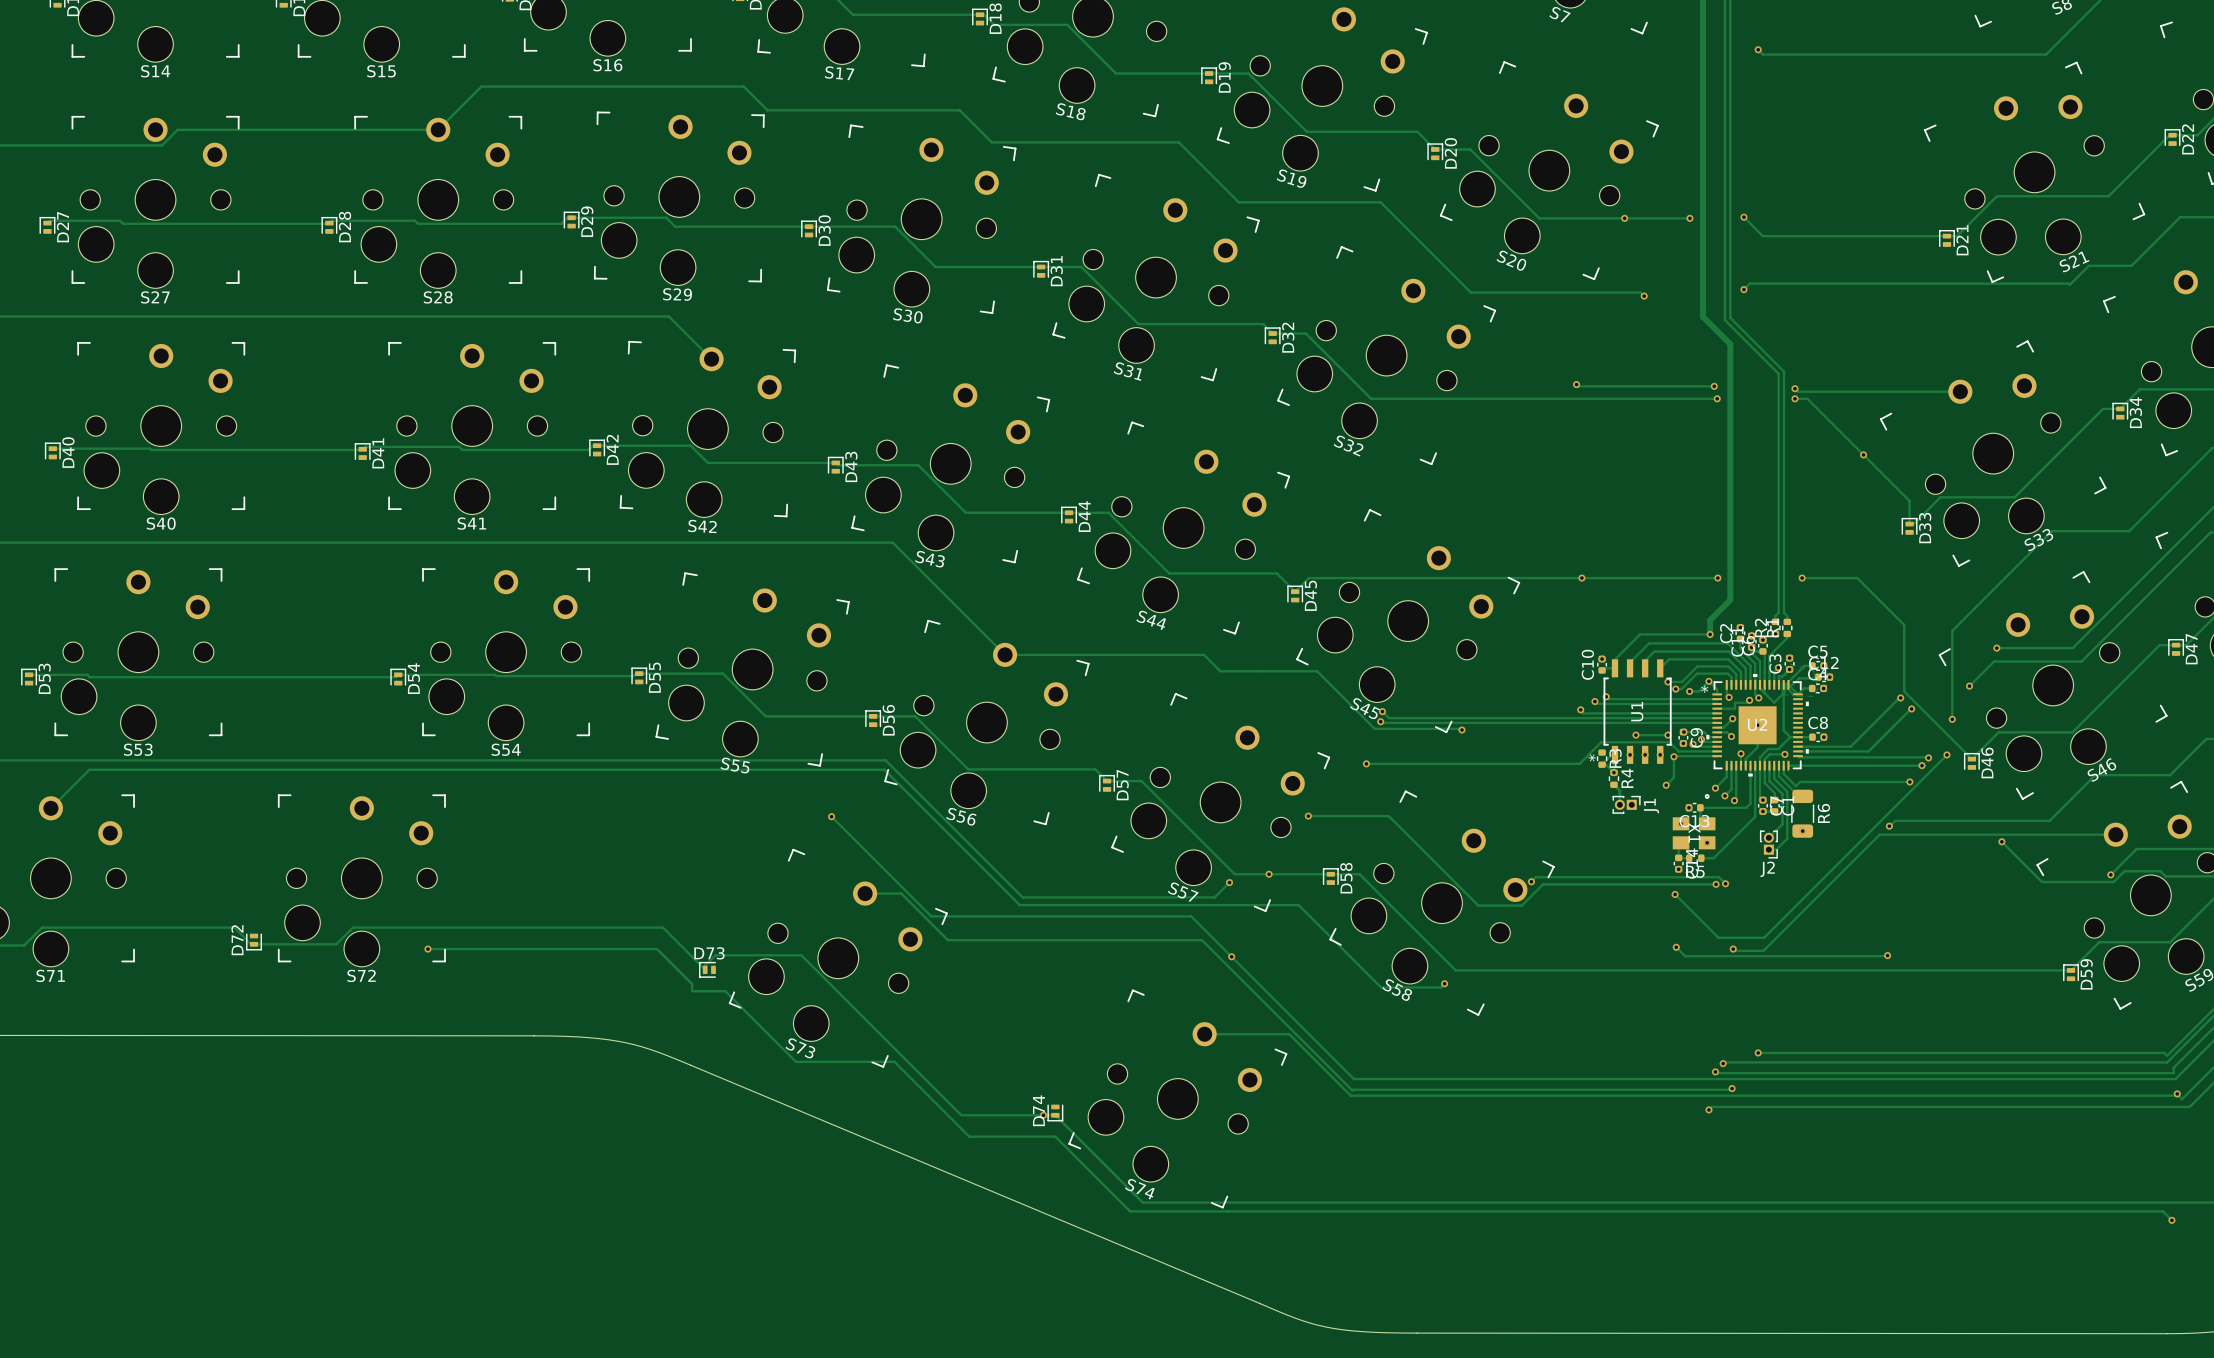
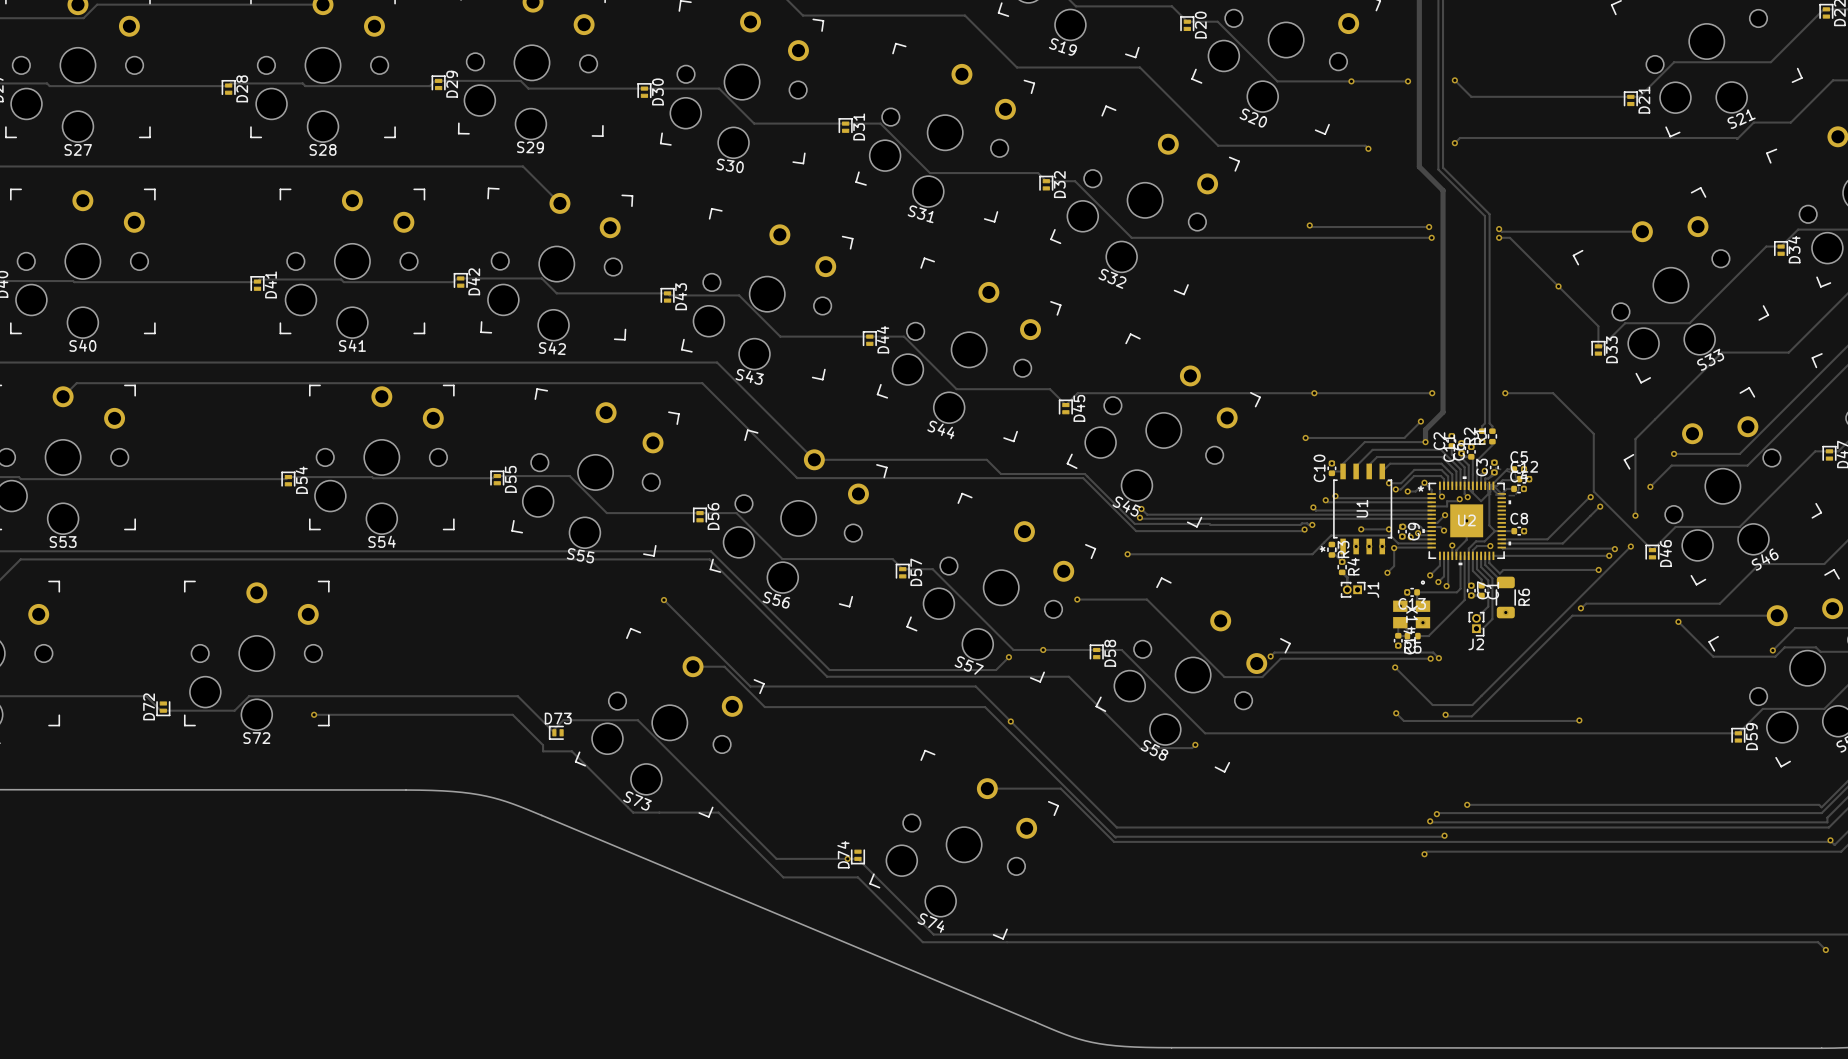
track: none -> (63, 396) (76, 383) (702, 383) (797, 478) (1083, 478) (1136, 531) (1303, 531) (1304, 529)
track: none -> (1420, 421) (1404, 437) (1305, 437)
via: none -> (1420, 421)
via: none -> (1305, 437)
track: none -> (1210, 524) (1300, 524) (1302, 523) (1312, 524)
via: (1462, 730) -> none
via: none -> (1312, 524)
via: none -> (1304, 529)

